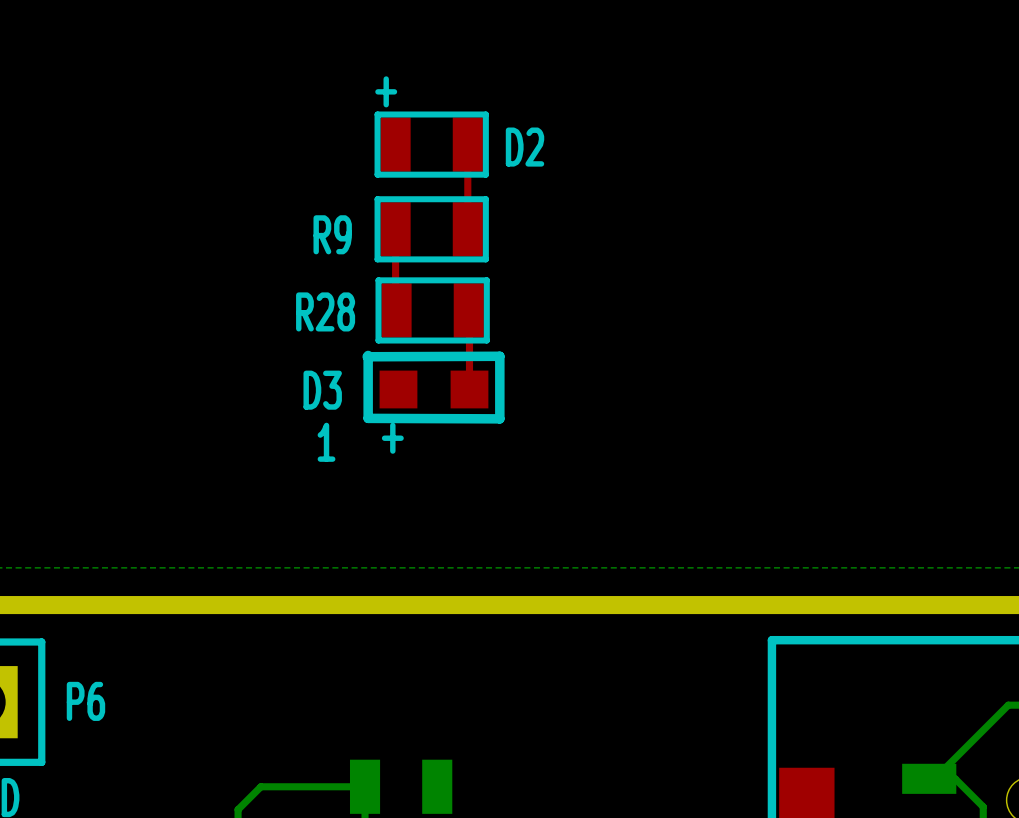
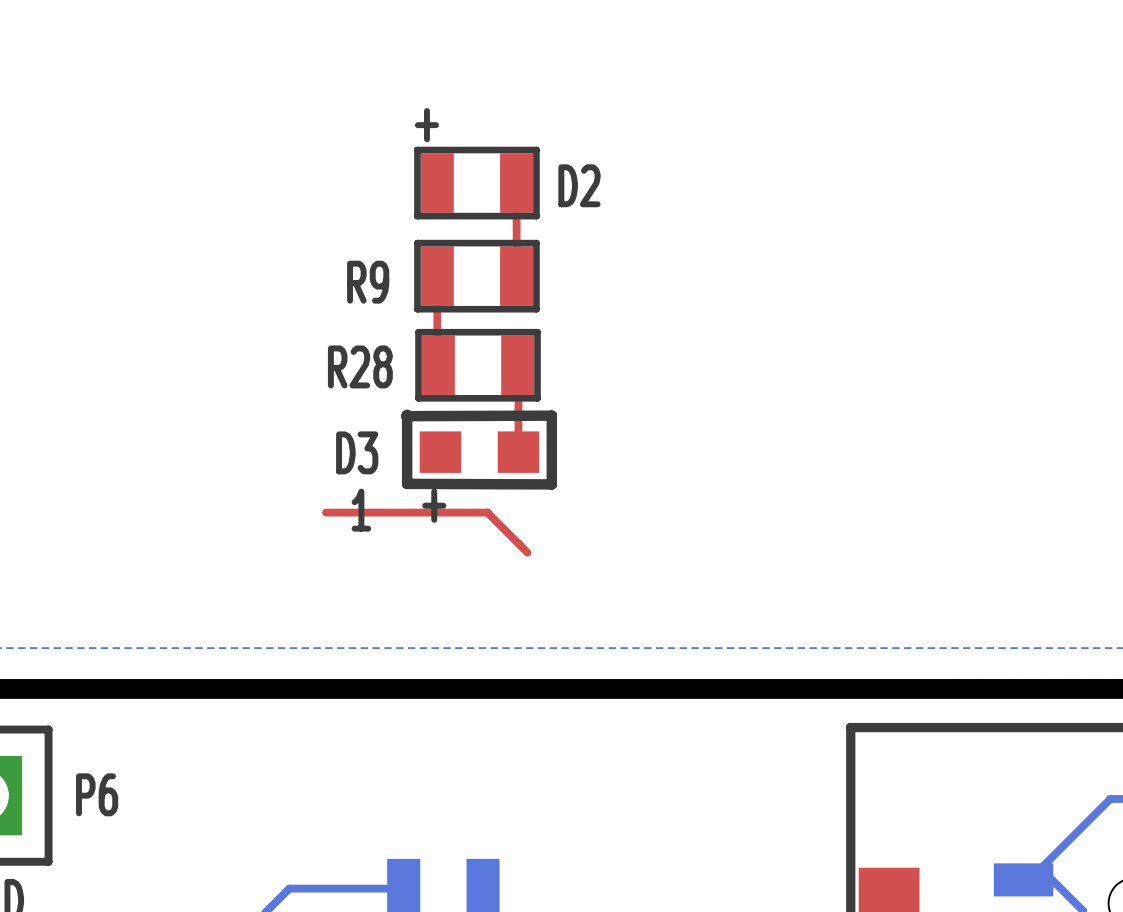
top track: none -> (325, 512) (487, 512) (527, 552)

